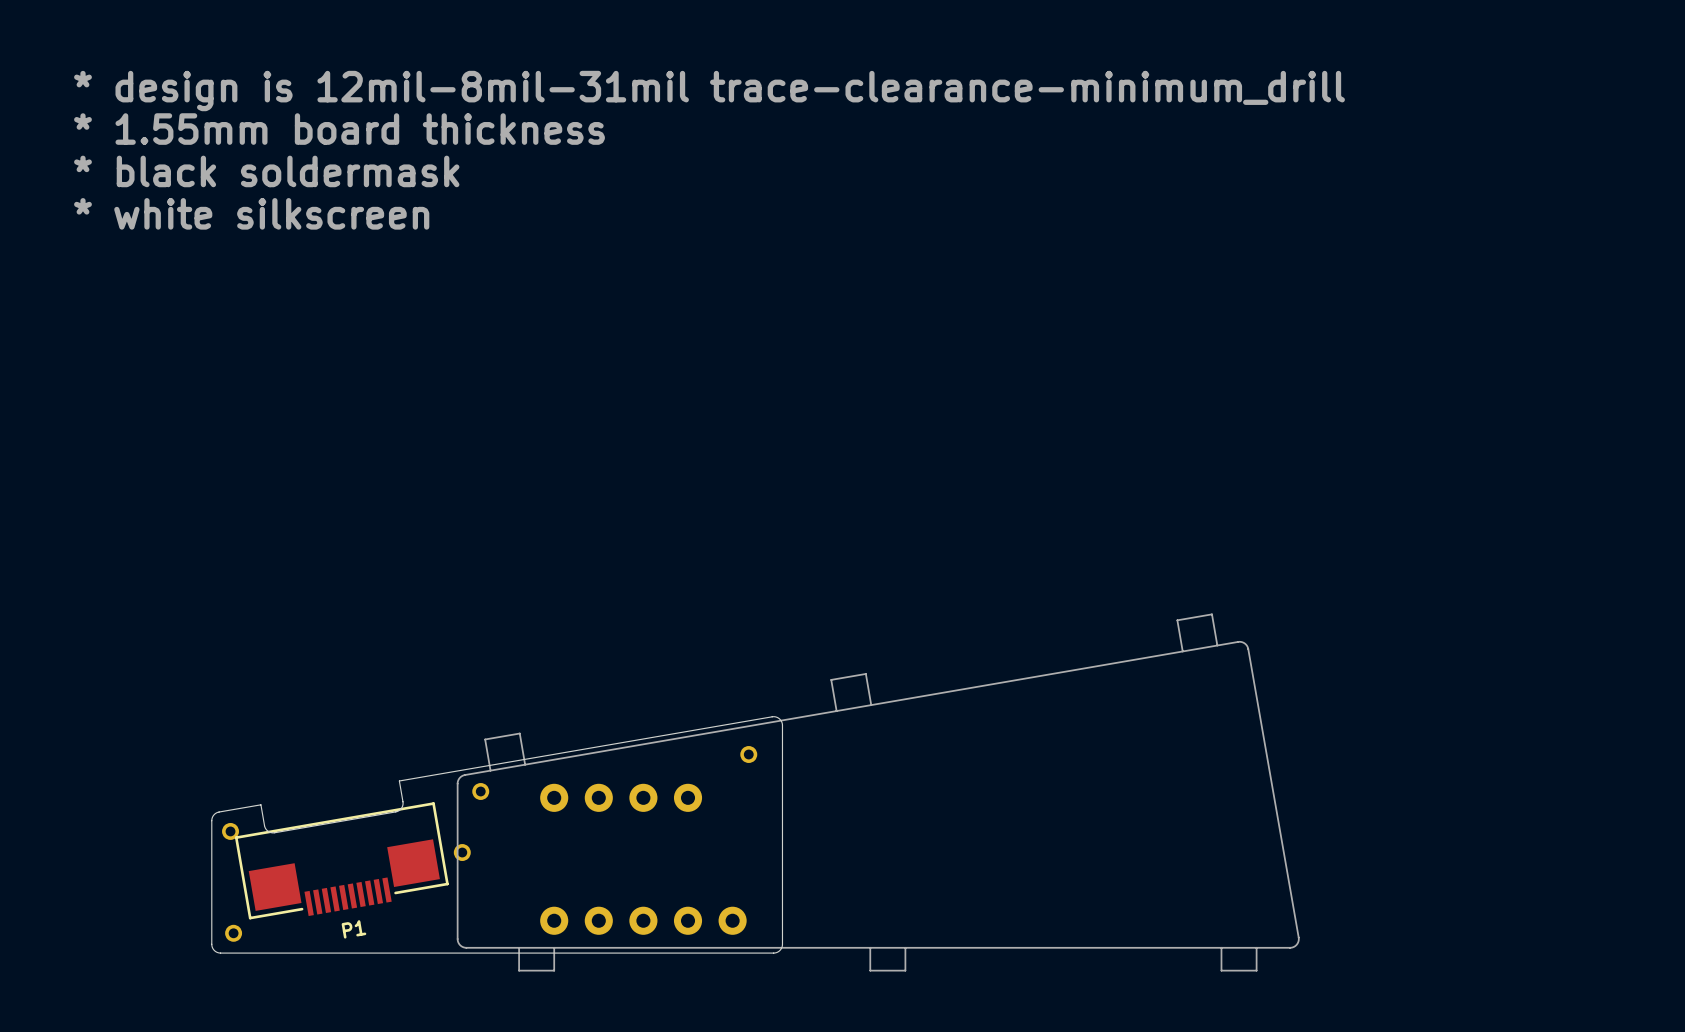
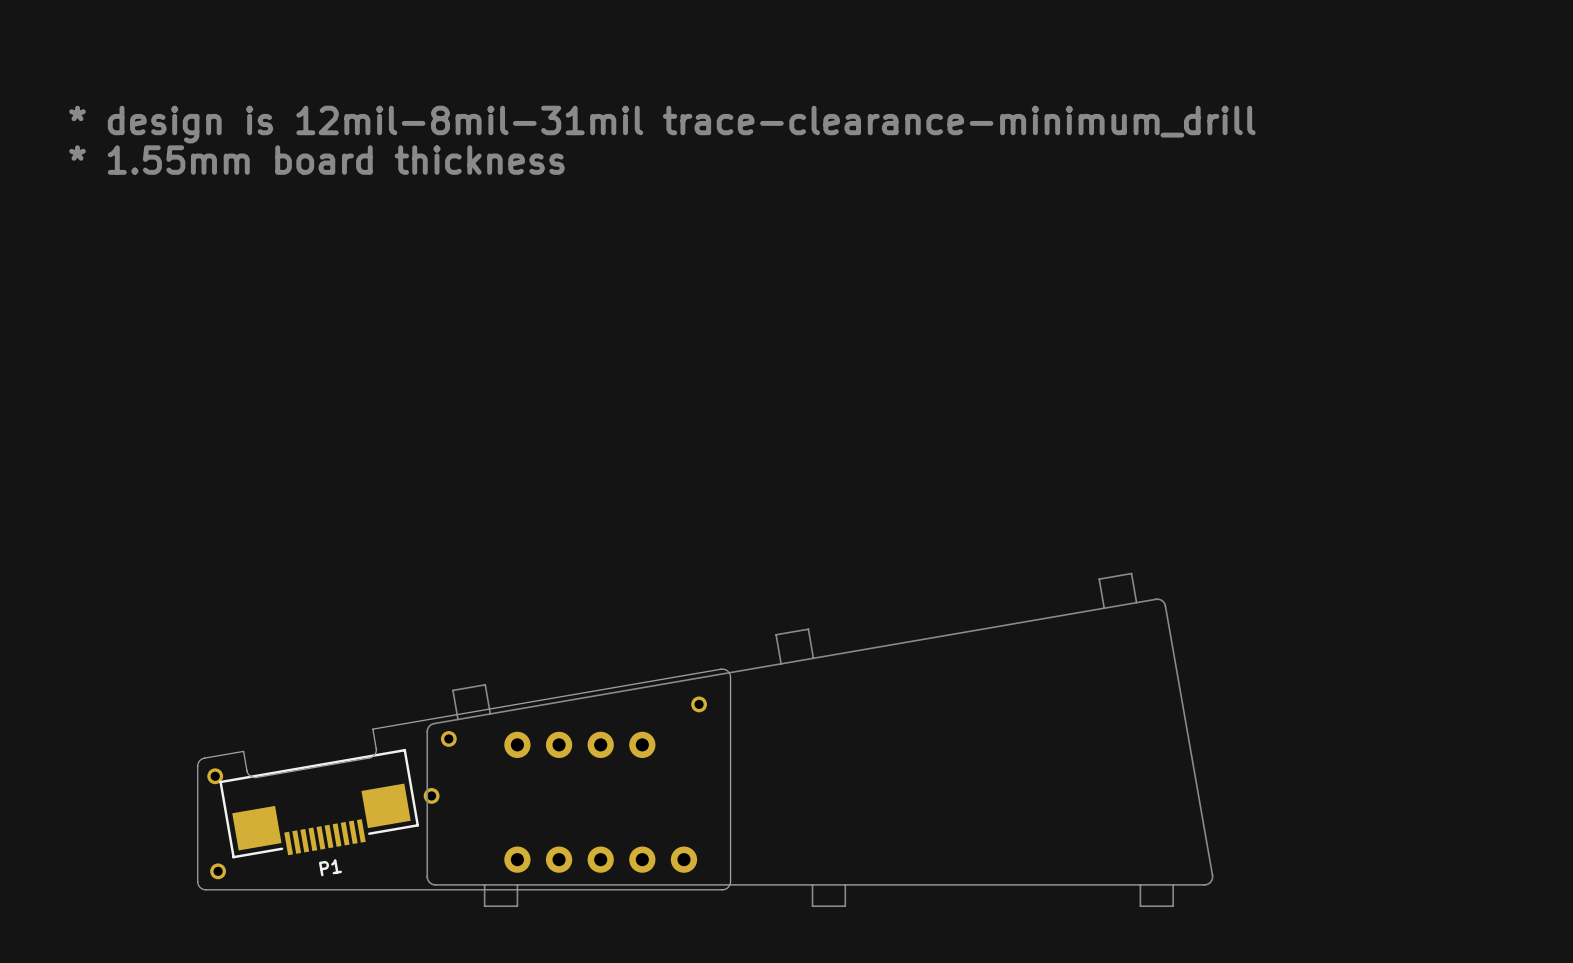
text: * design is 12mil-8mil-31mil trace-clearance-minimum_drill (709, 91) -> none
text: * 1.55mm board thickness (339, 129) -> * design is 12mil-8mil-31mil trace-clearance-minimum_drill (662, 124)
text: * black soldermask (266, 171) -> * 1.55mm board thickness (316, 160)
text: * white silkscreen (251, 213) -> none

